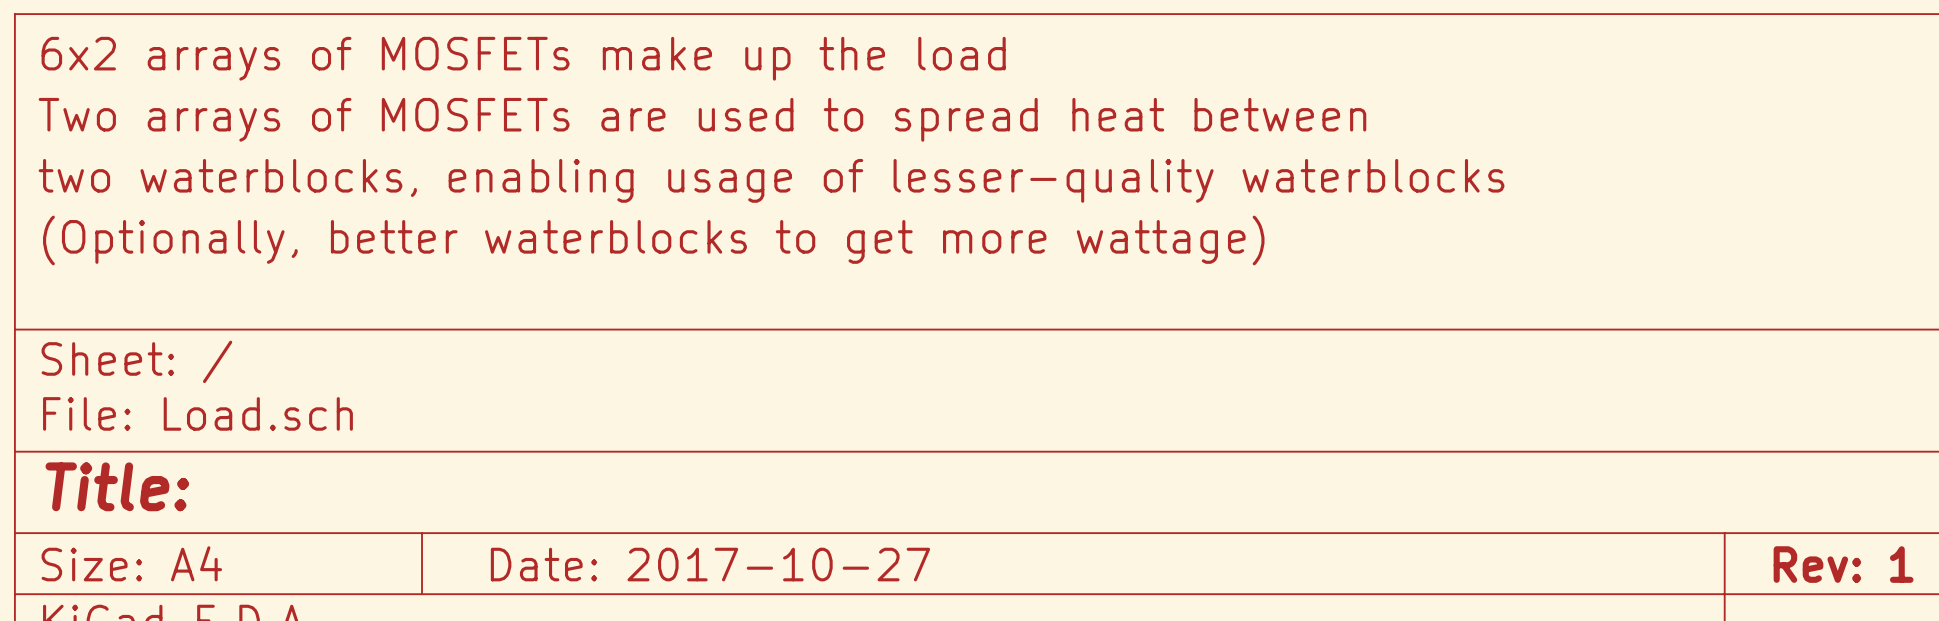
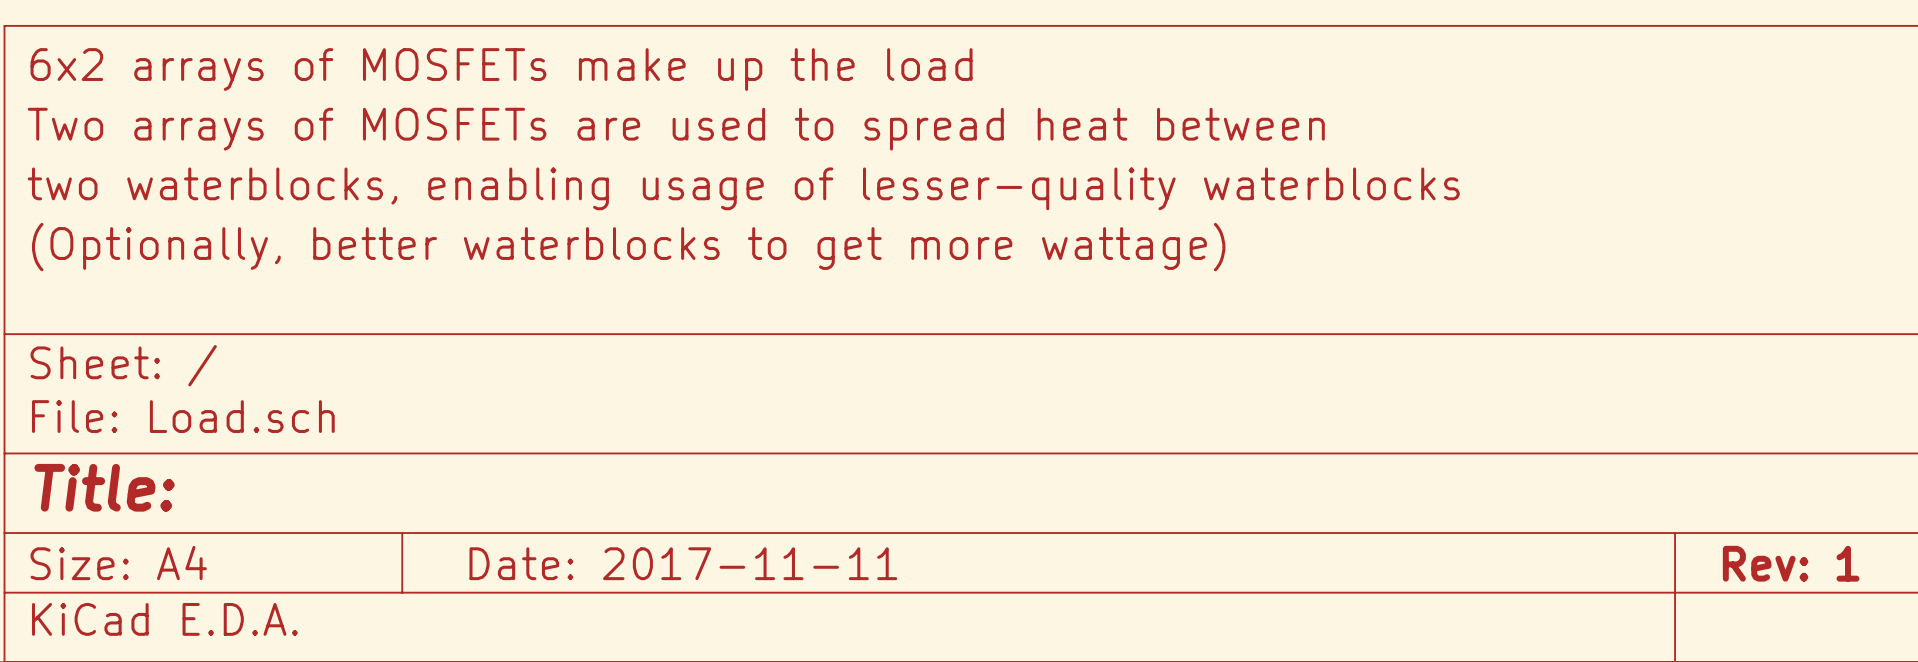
title block: Date: 2017-10-27 (710, 564) -> Date: 2017-11-11 (683, 563)

